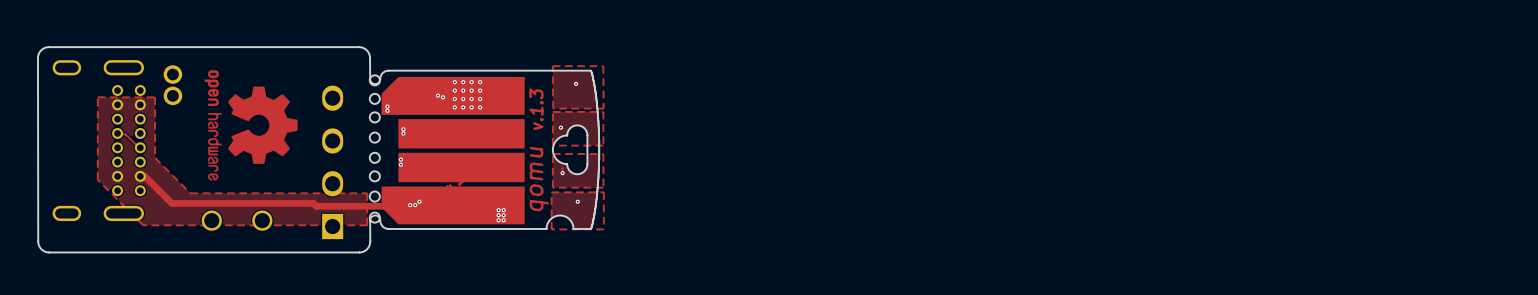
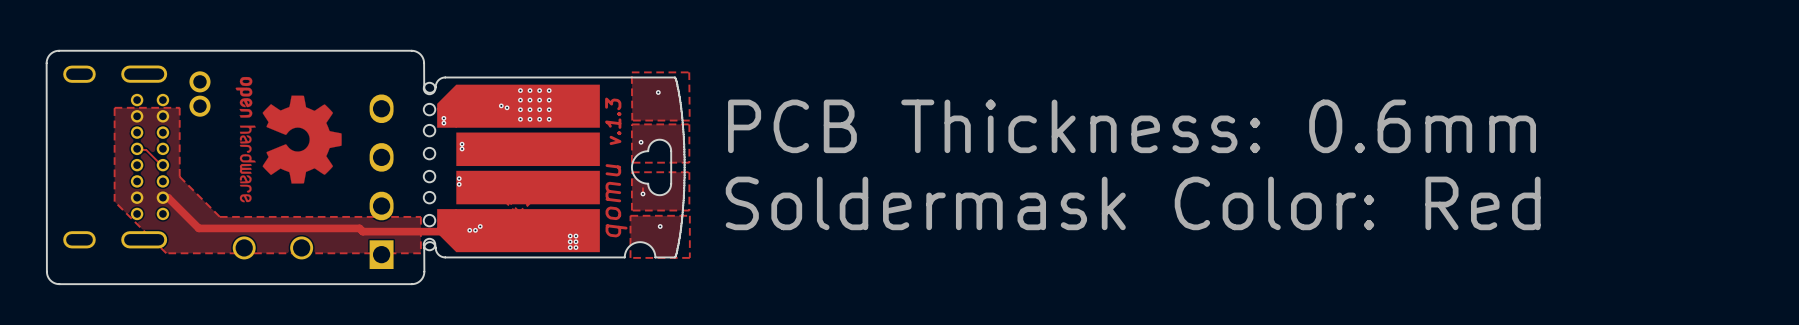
text: none -> PCB Thickness: 0.6mm (1132, 126)
text: none -> Soldermask Color: Red (1133, 203)

